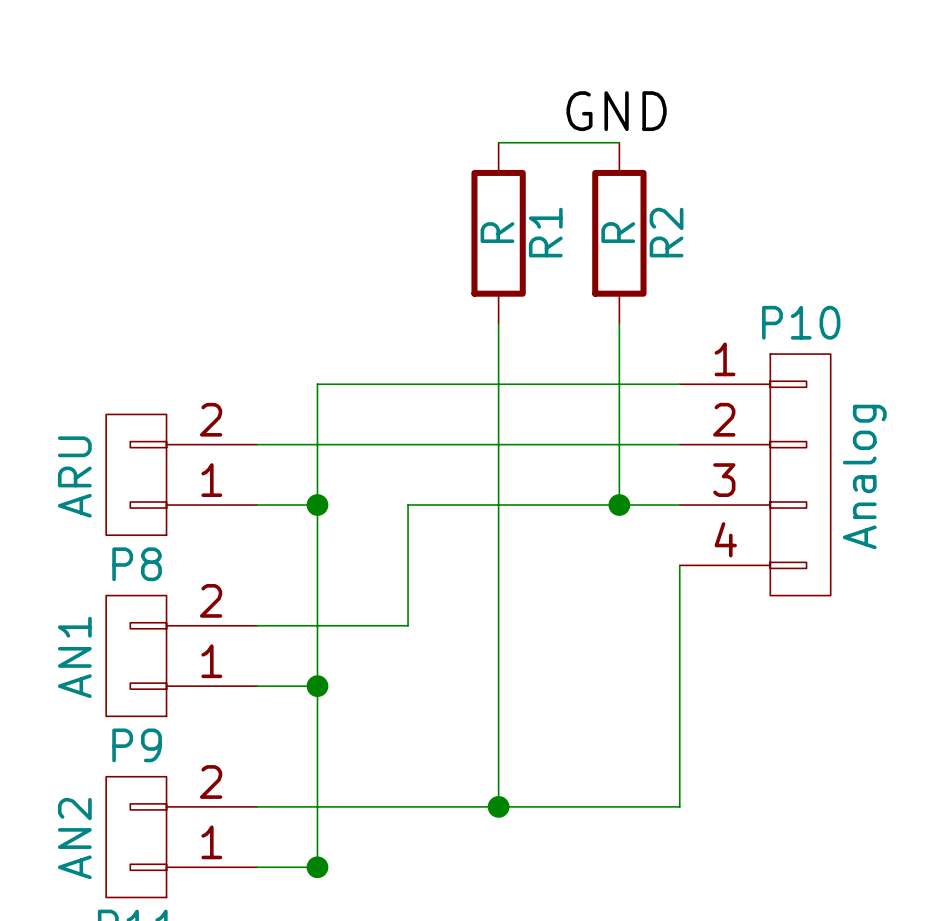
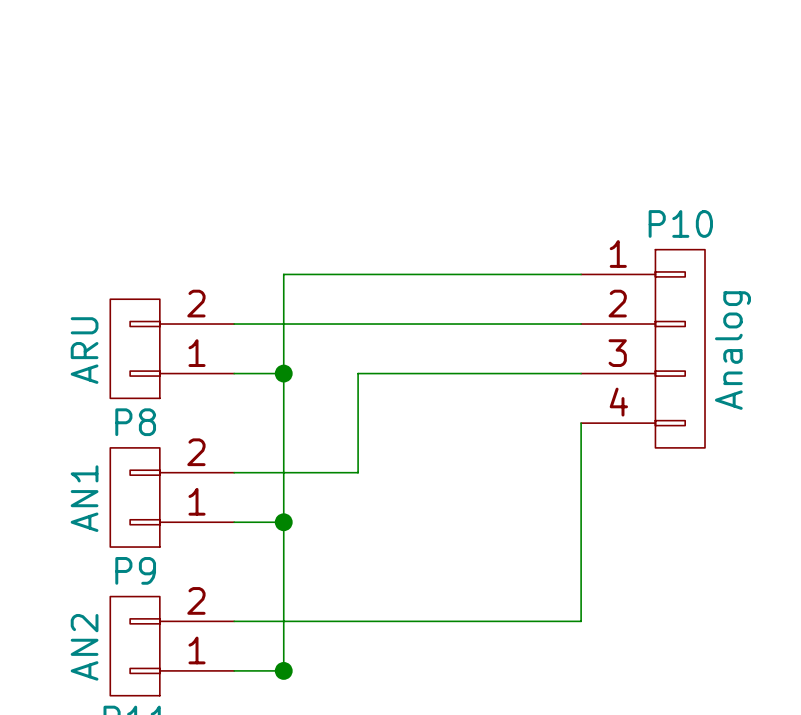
label: GND (616, 111) -> none
wire: (498, 142) (619, 142) -> none
R1: R (498, 233) -> none
R2: R (619, 233) -> none
wire: (498, 323) (498, 806) -> none
wire: (619, 323) (619, 505) -> none
junction: (619, 505) -> none
junction: (498, 806) -> none

